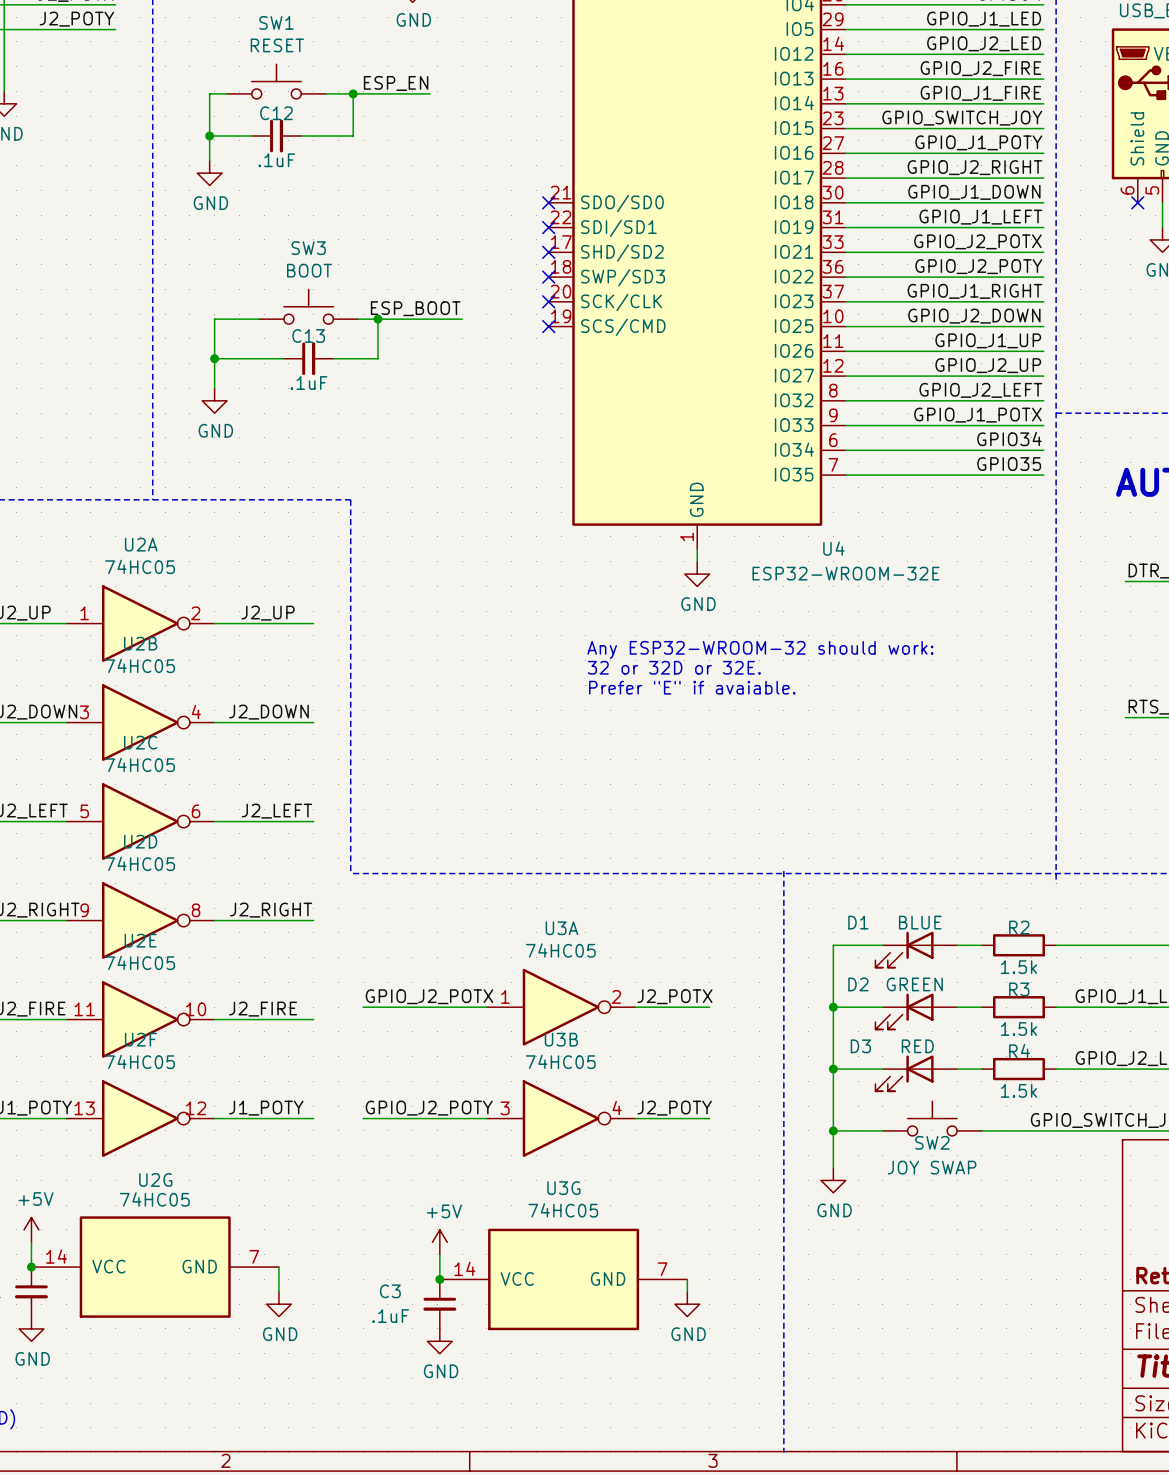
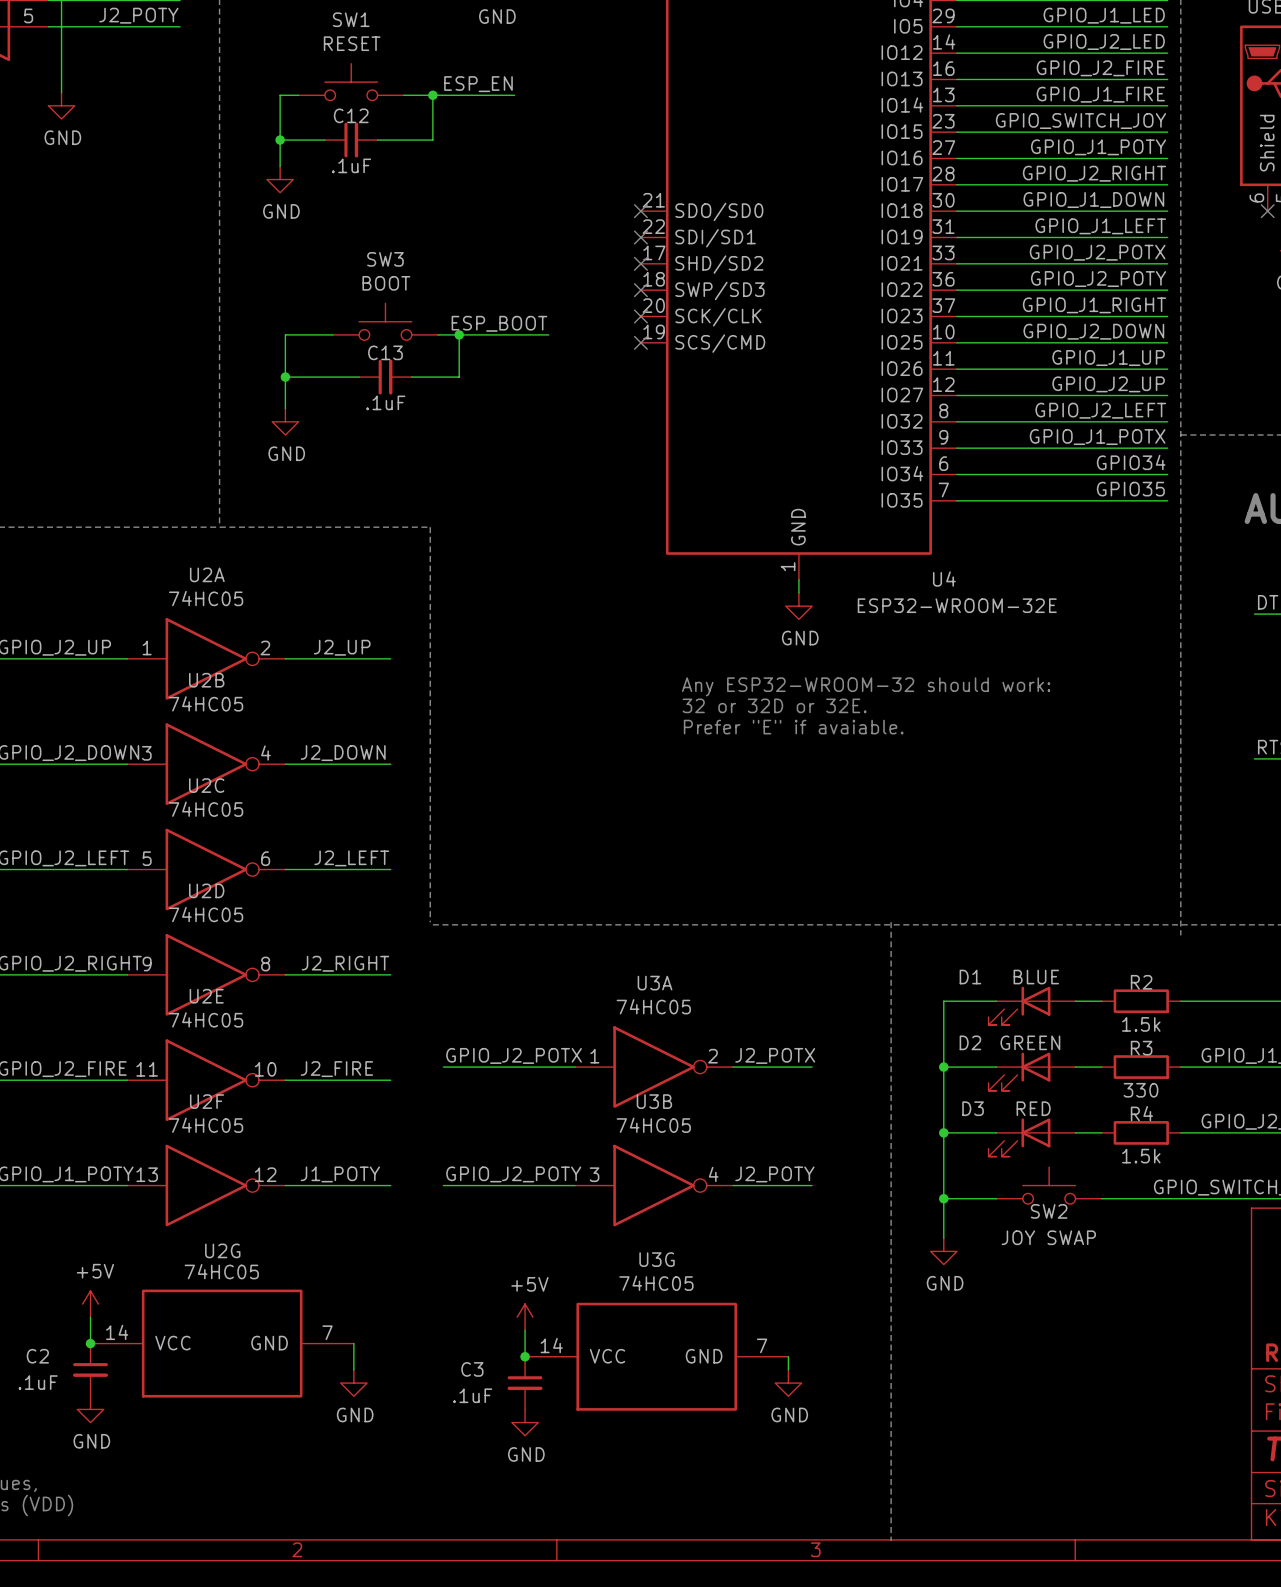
R3 value: 1.5k (1018, 1029) -> 330 (1140, 1090)

